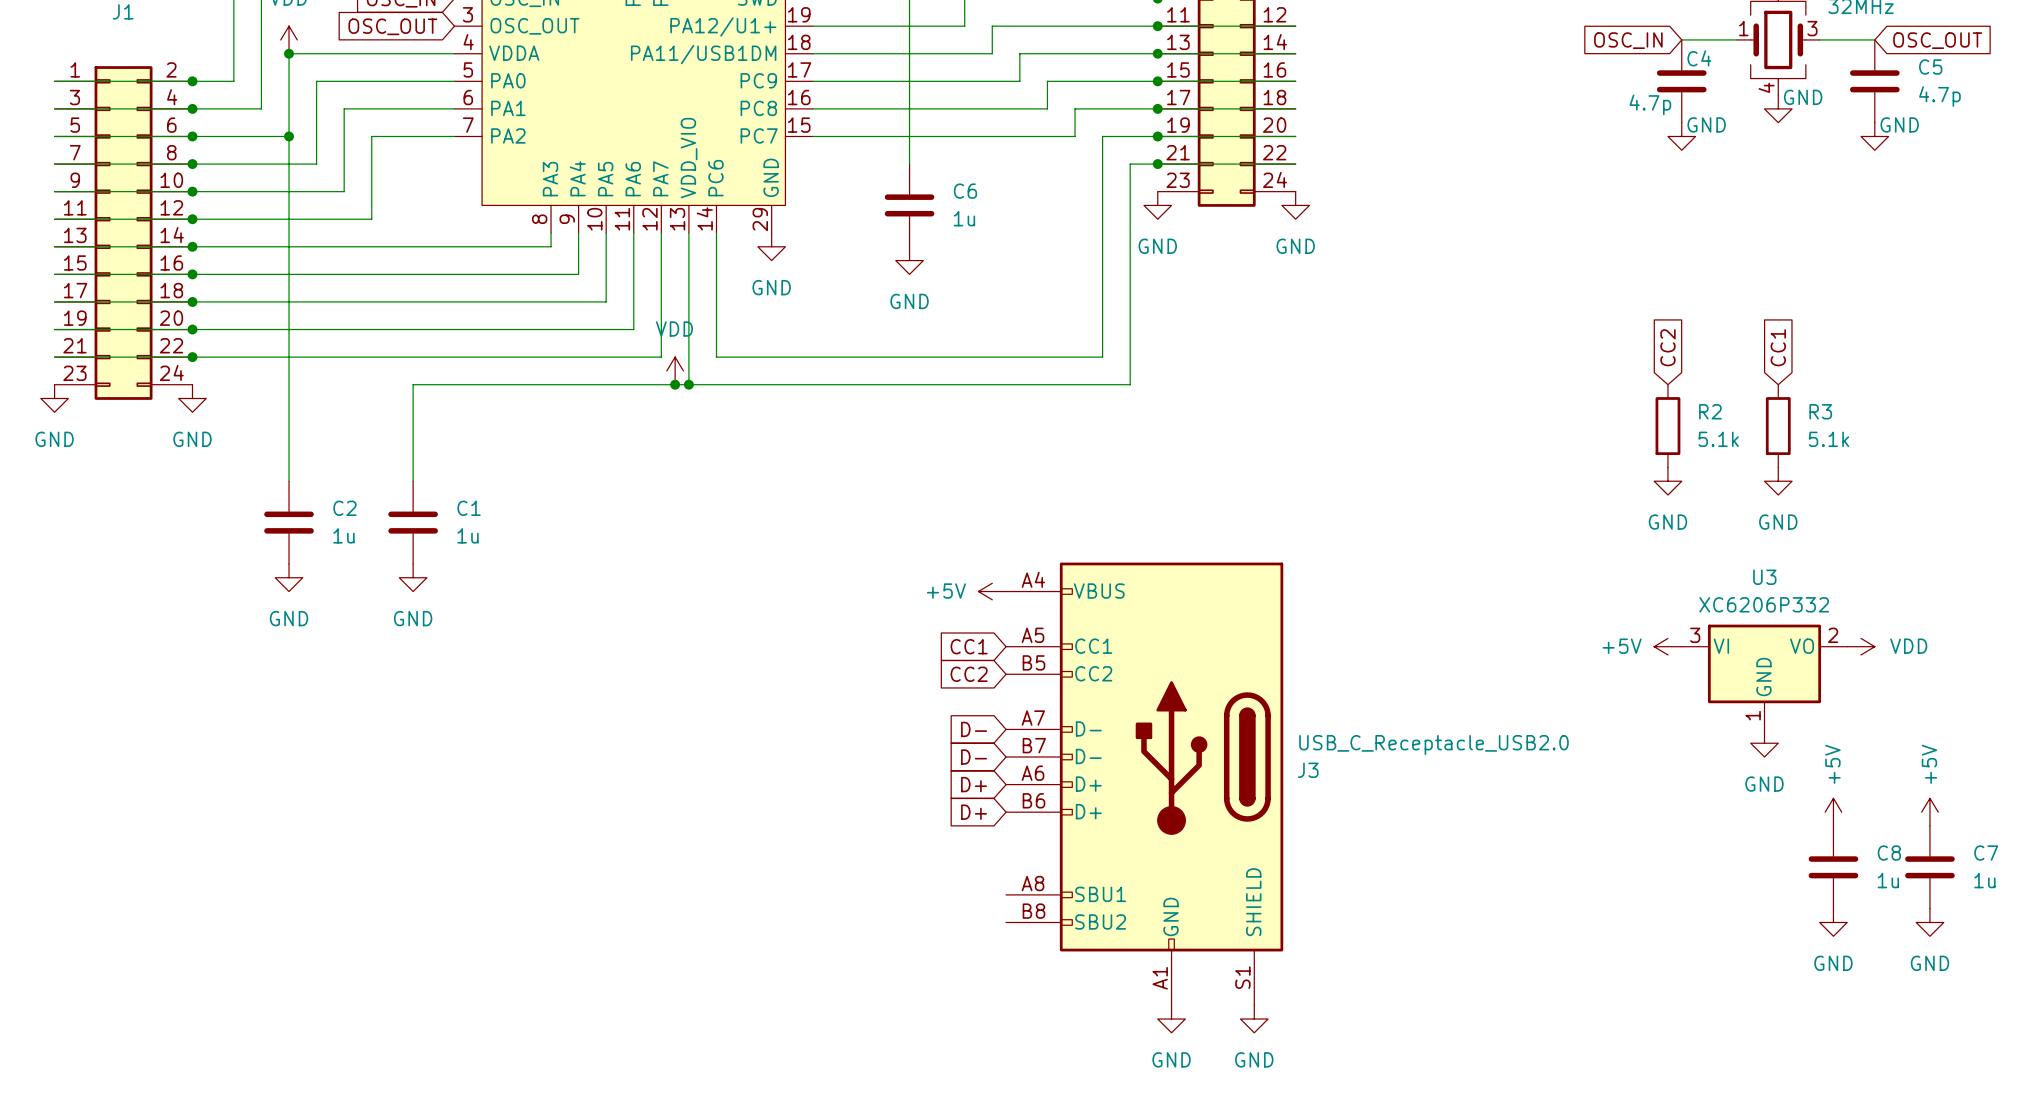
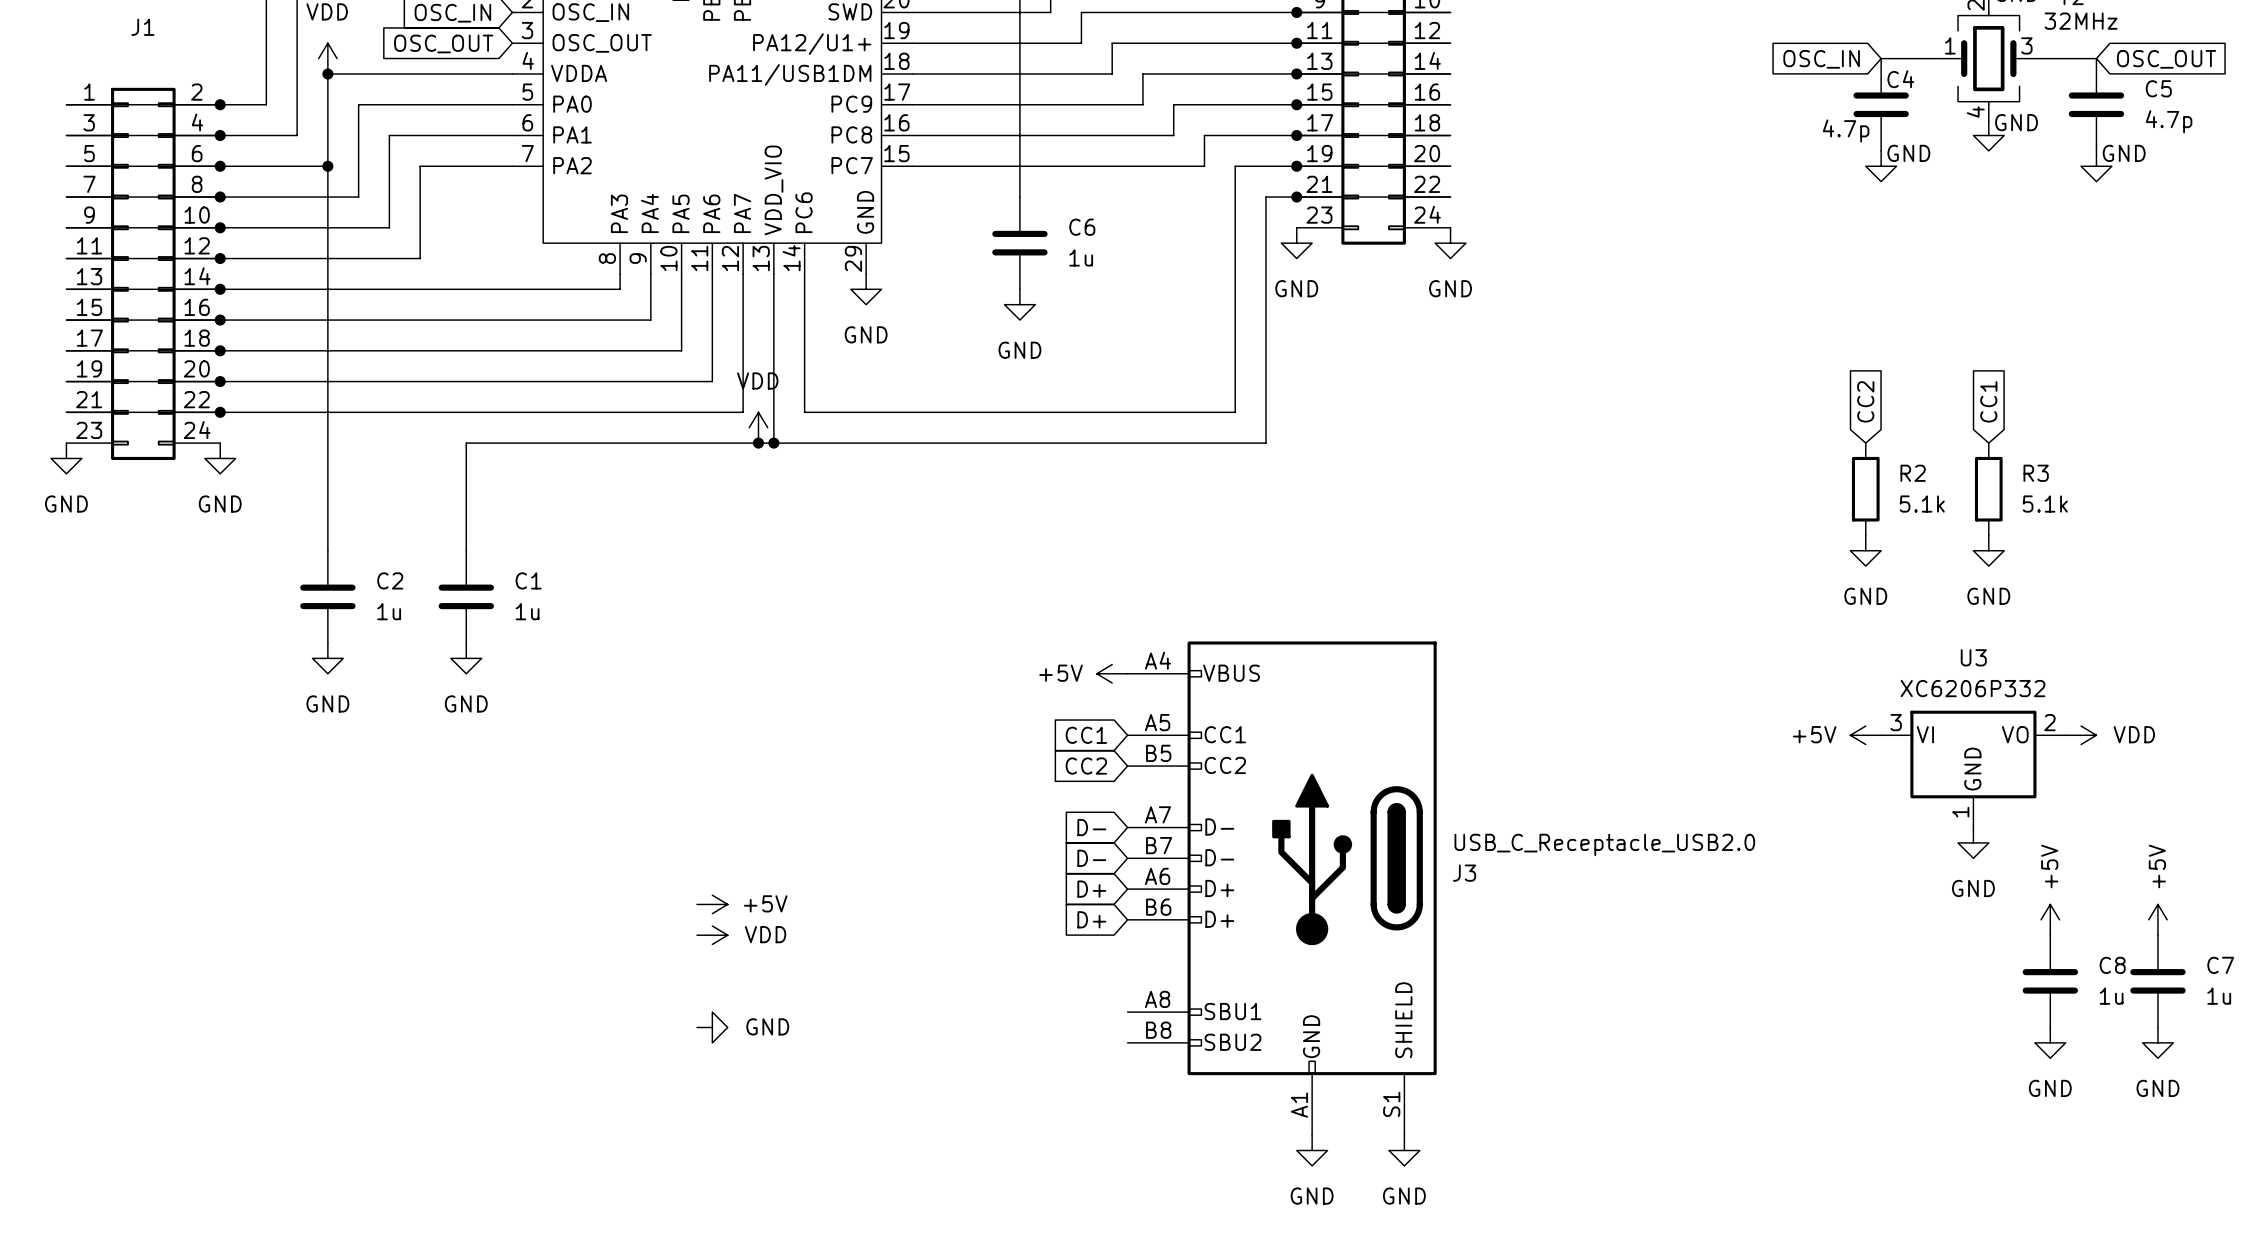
power symbol: none -> +5V (712, 904)
power symbol: none -> VDD (712, 935)
power symbol: none -> GND (712, 1027)

